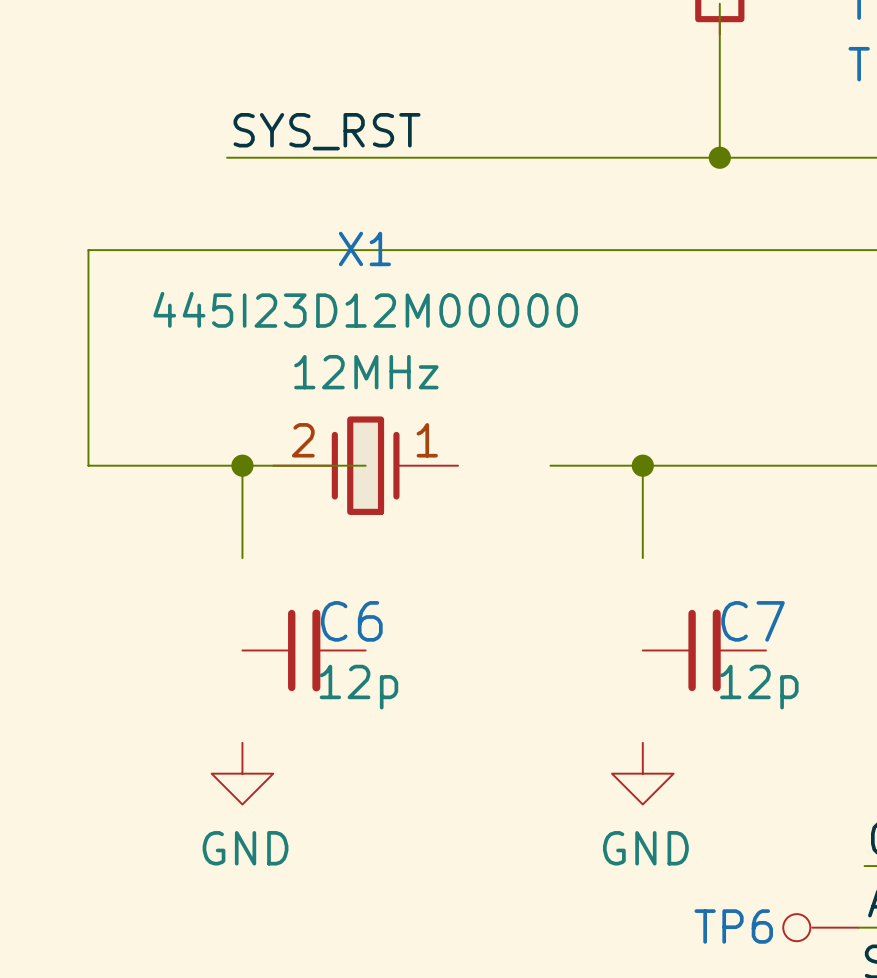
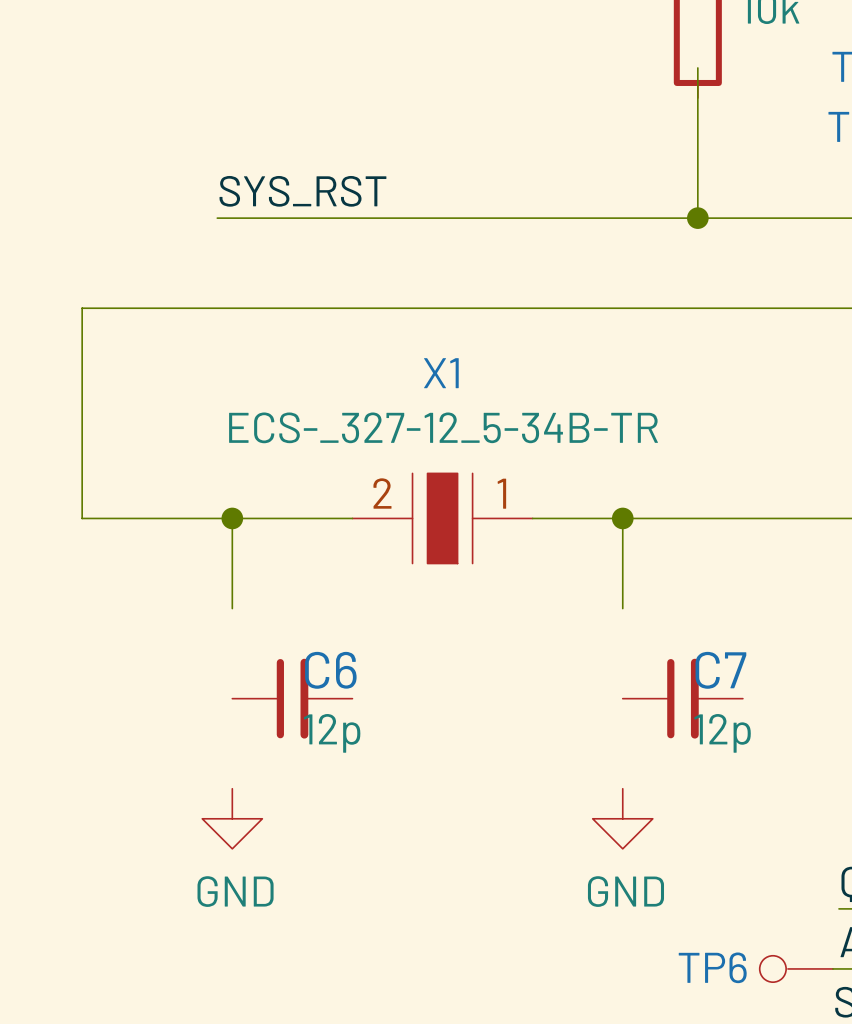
X1 name position: X1 (364, 248) -> X1 (441, 373)
X1 text: 445I23D12M00000 (365, 309) -> none
X1 text: 12MHz (366, 372) -> none
X1 value: none -> ECS-_327-12_5-34B-TR (443, 427)
X1 symbol: [273, 416, 459, 515] -> [352, 473, 533, 564]

